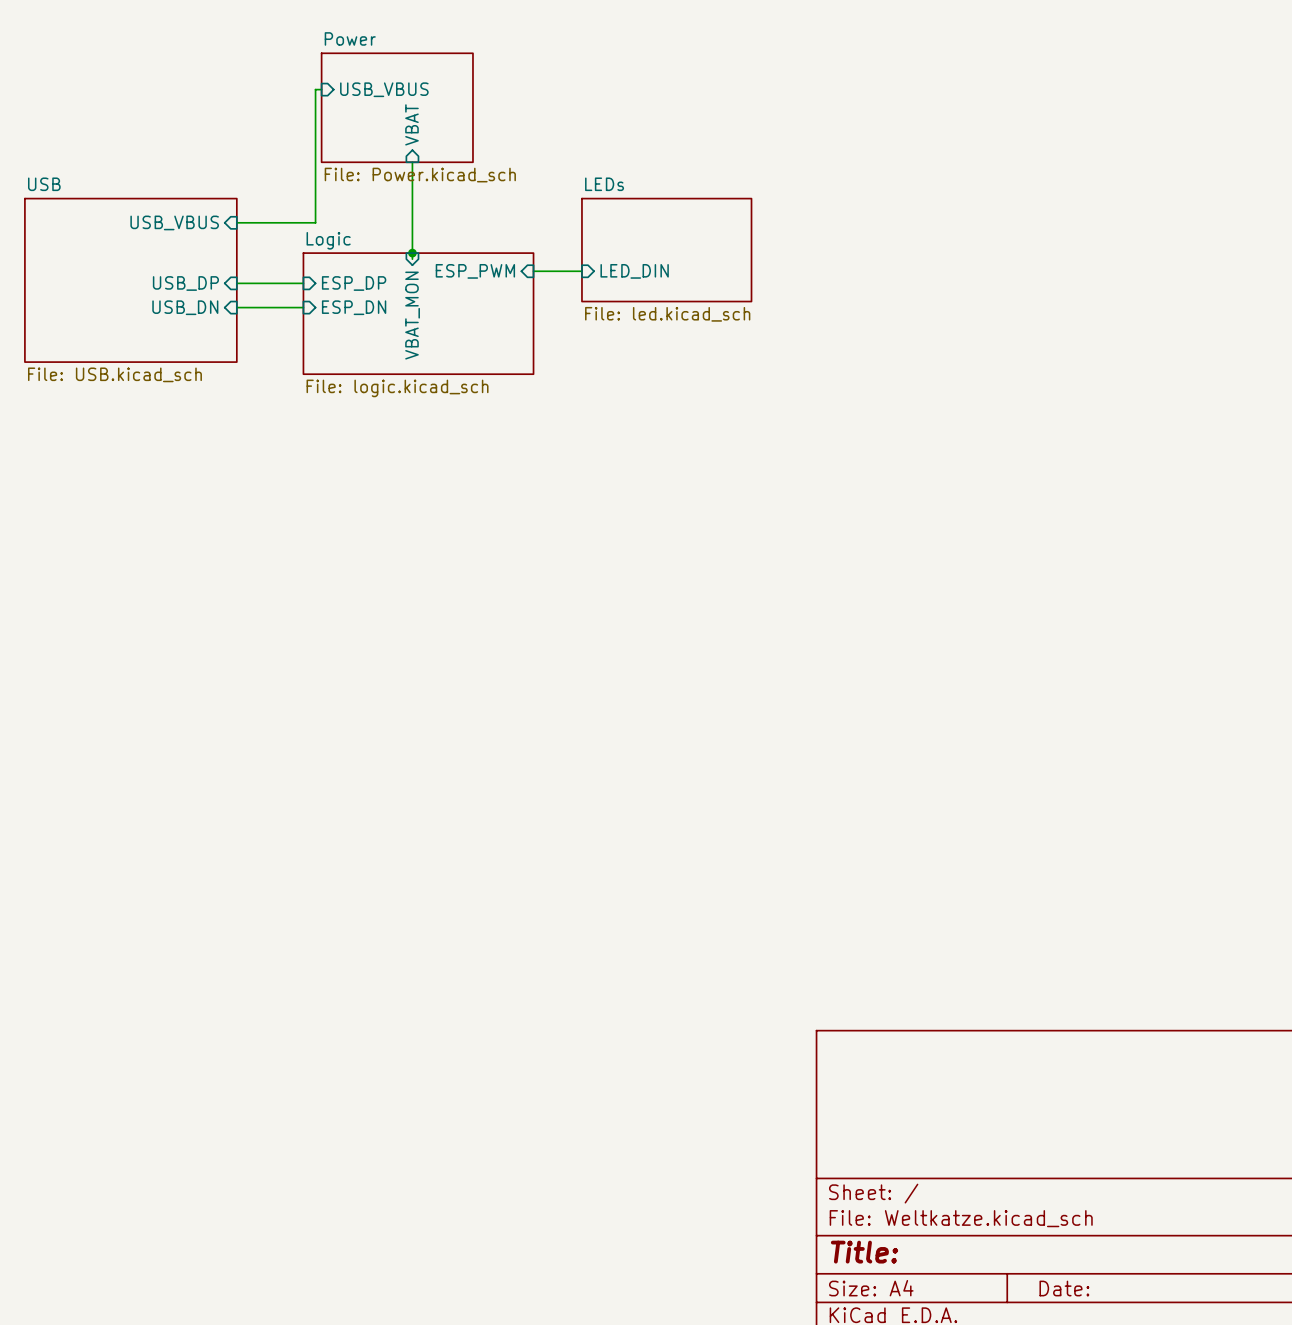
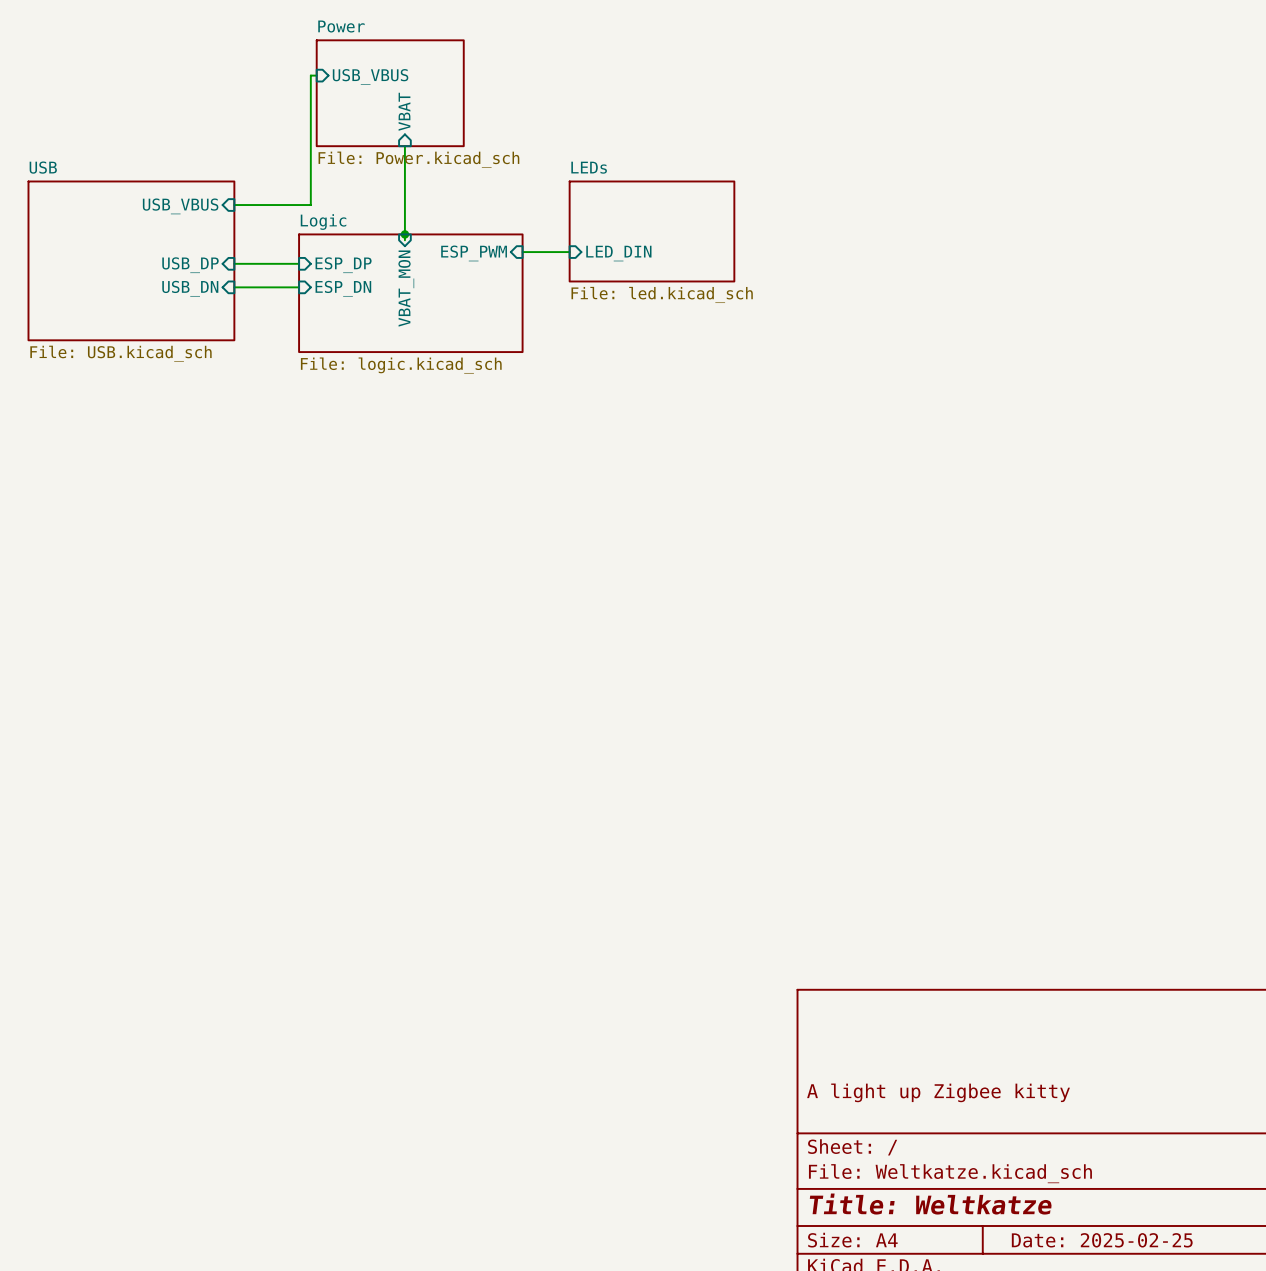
title block: none -> A light up Zigbee kitty (938, 1092)
title block: Title: (864, 1252) -> Title: Weltkatze (930, 1204)
title block: Date: (1064, 1288) -> Date: 2025-02-25 (1102, 1240)

